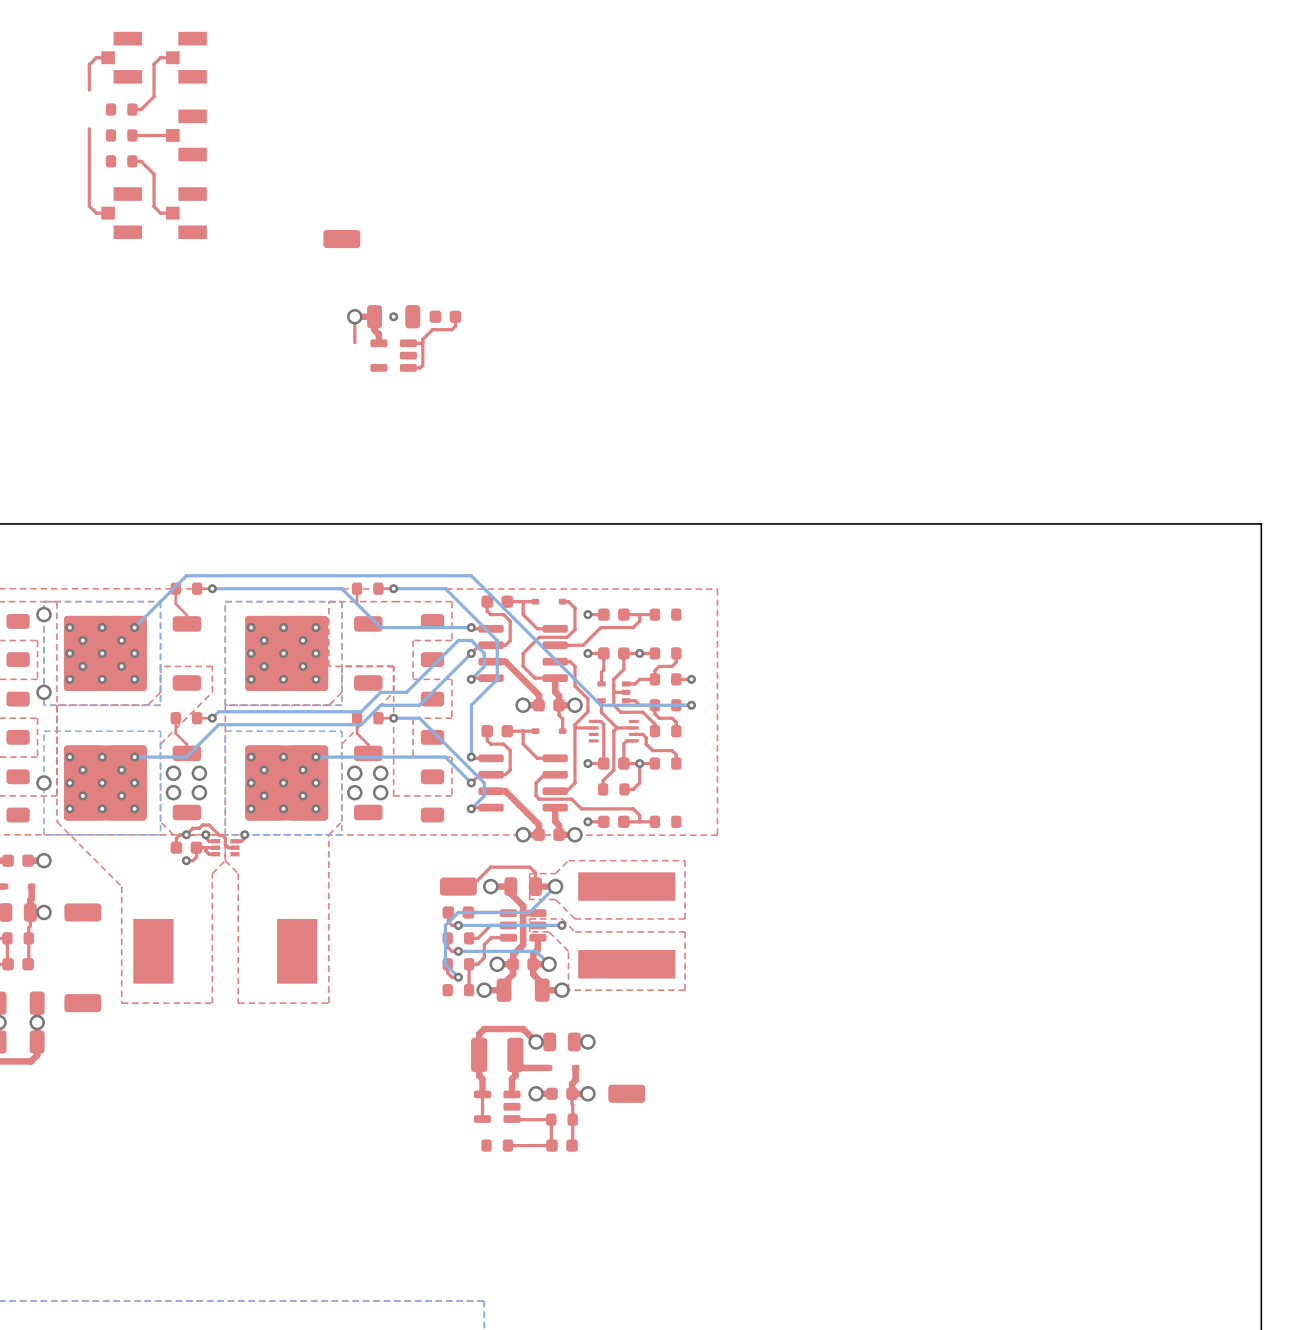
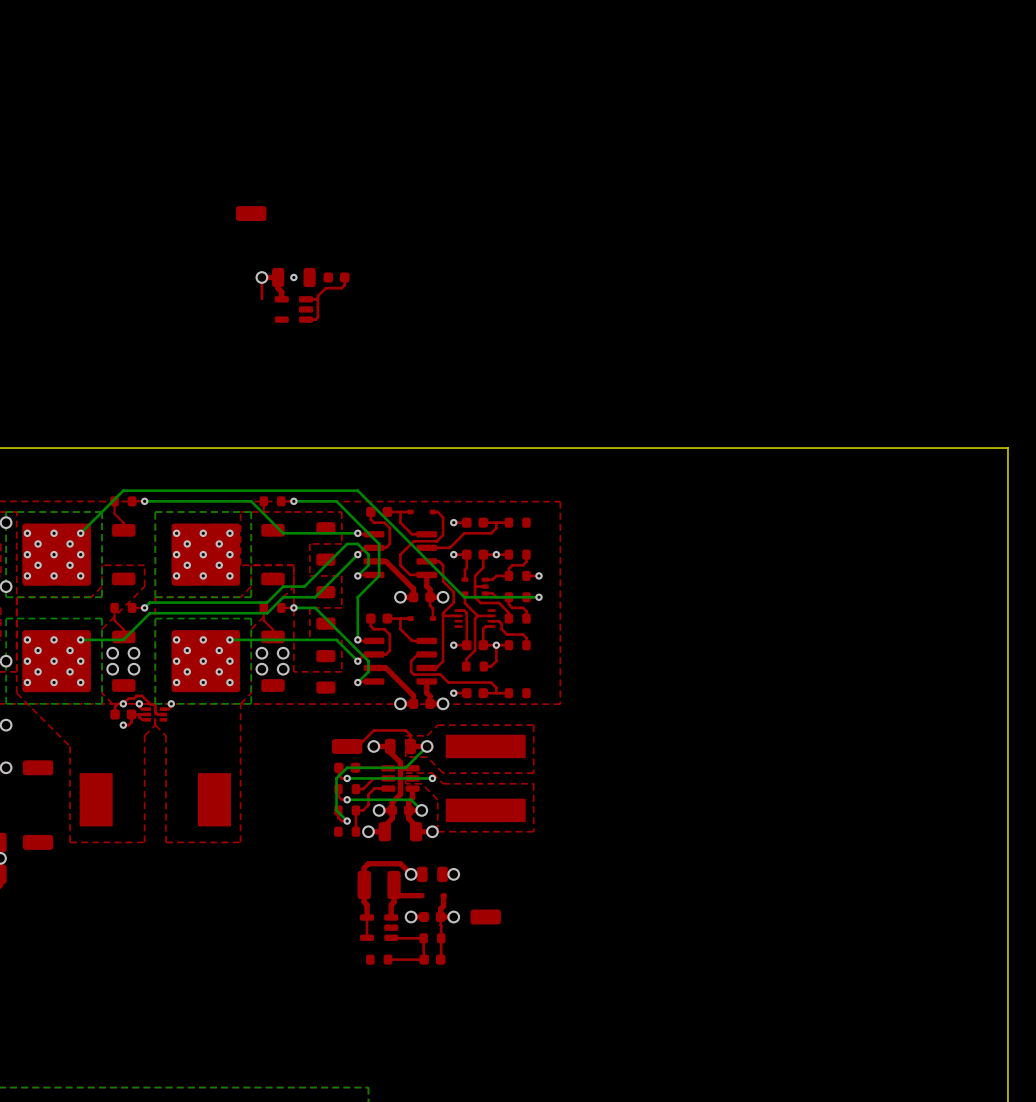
top track: (108, 57) (96, 57) (89, 64) (89, 90) -> none
part: (121, 57) -> none
top track: (172, 57) (160, 57) (154, 64) (154, 96) (141, 109) (132, 109) -> none
part: (186, 57) -> none
part: (121, 109) -> none
top track: (89, 128) (89, 206) (96, 213) (108, 213) -> none
part: (121, 135) -> none
top track: (172, 135) (132, 135) -> none
part: (186, 135) -> none
part: (121, 161) -> none
top track: (132, 161) (141, 161) (154, 174) (154, 206) (160, 213) (172, 213) -> none
part: (121, 213) -> none
part: (186, 213) -> none

